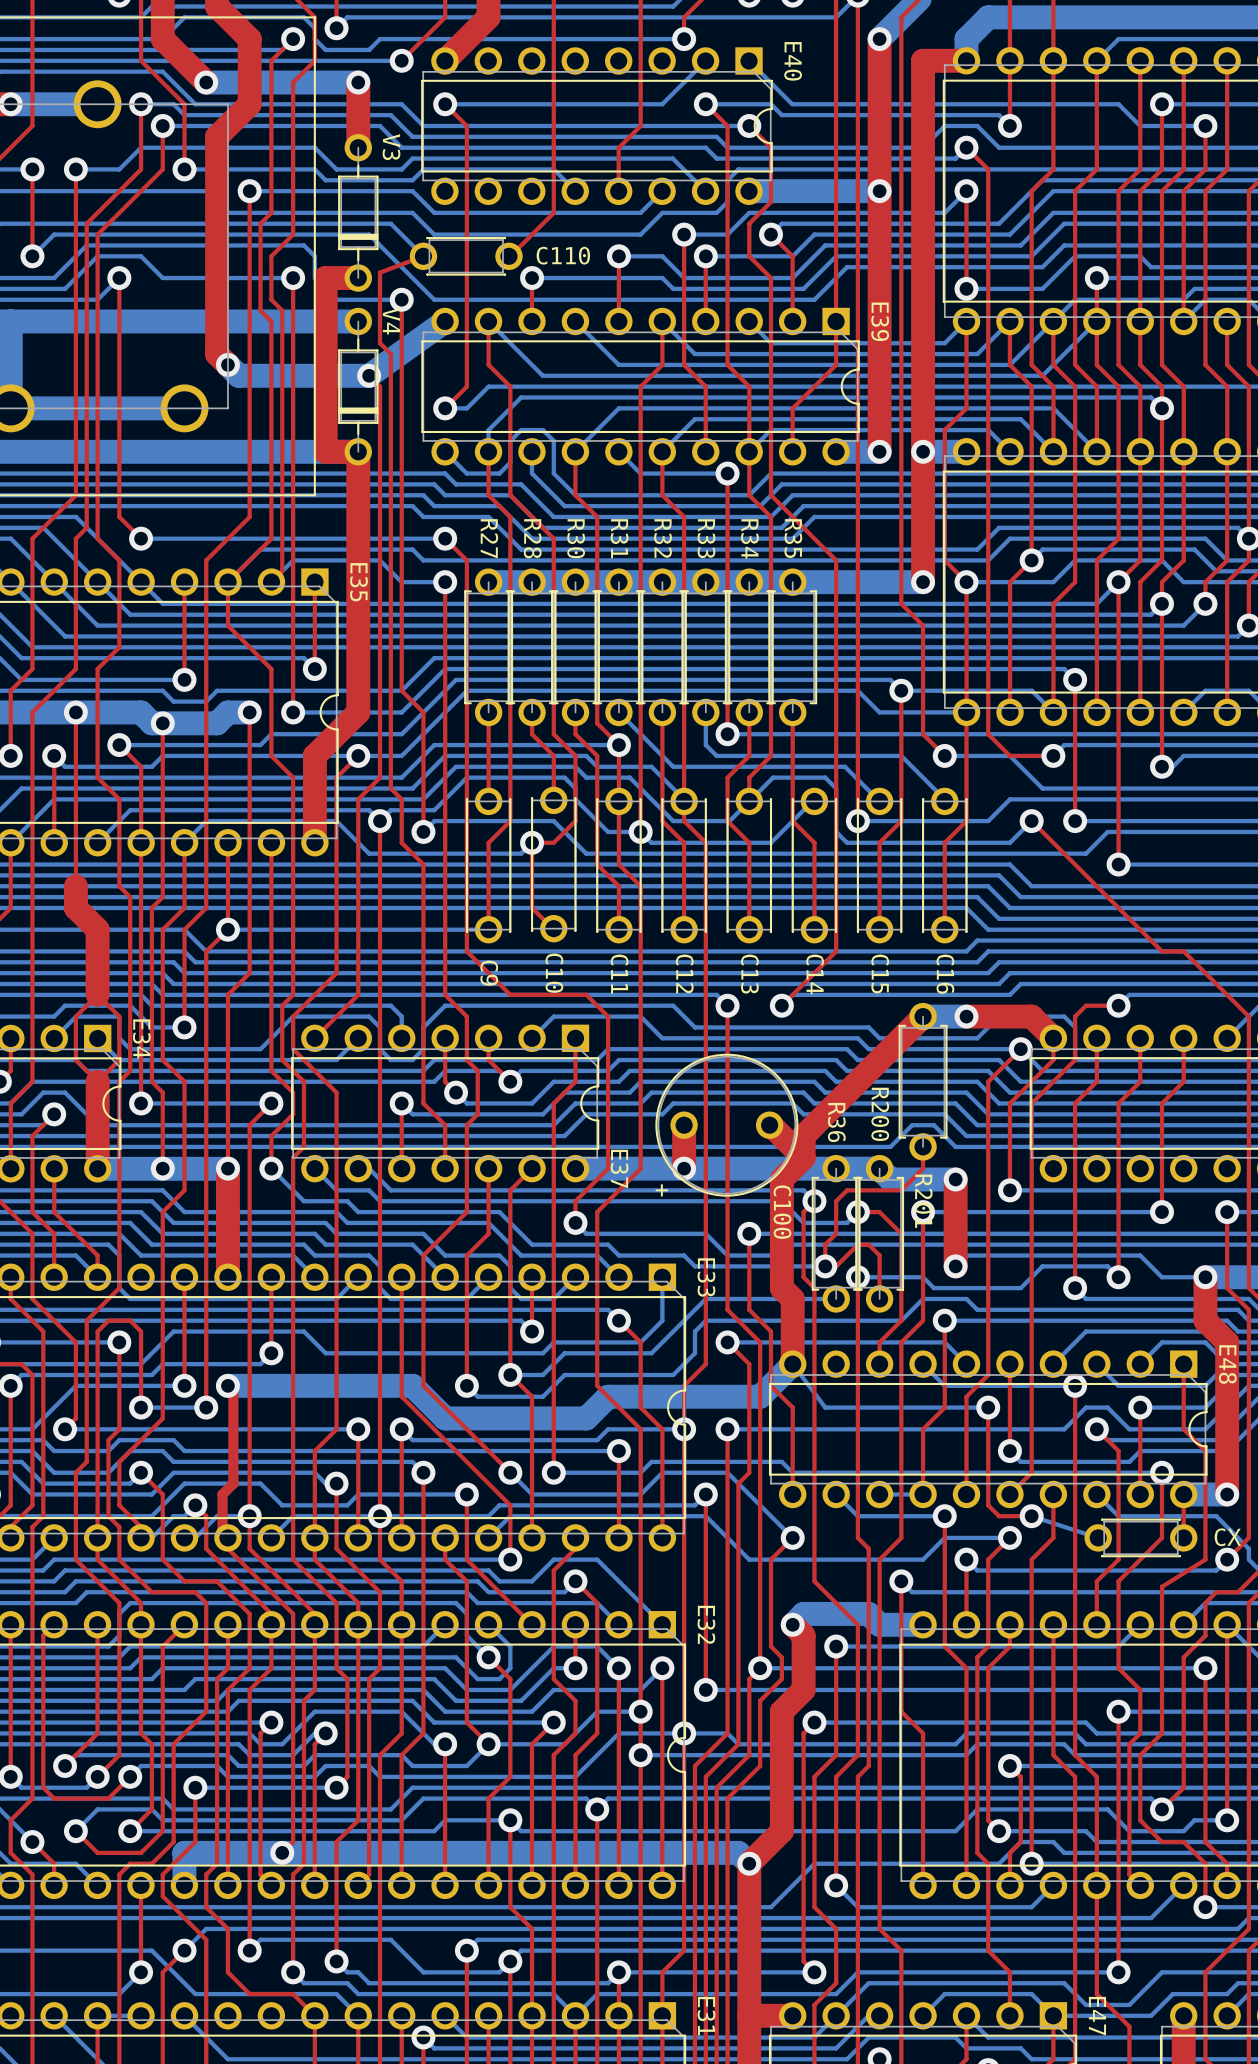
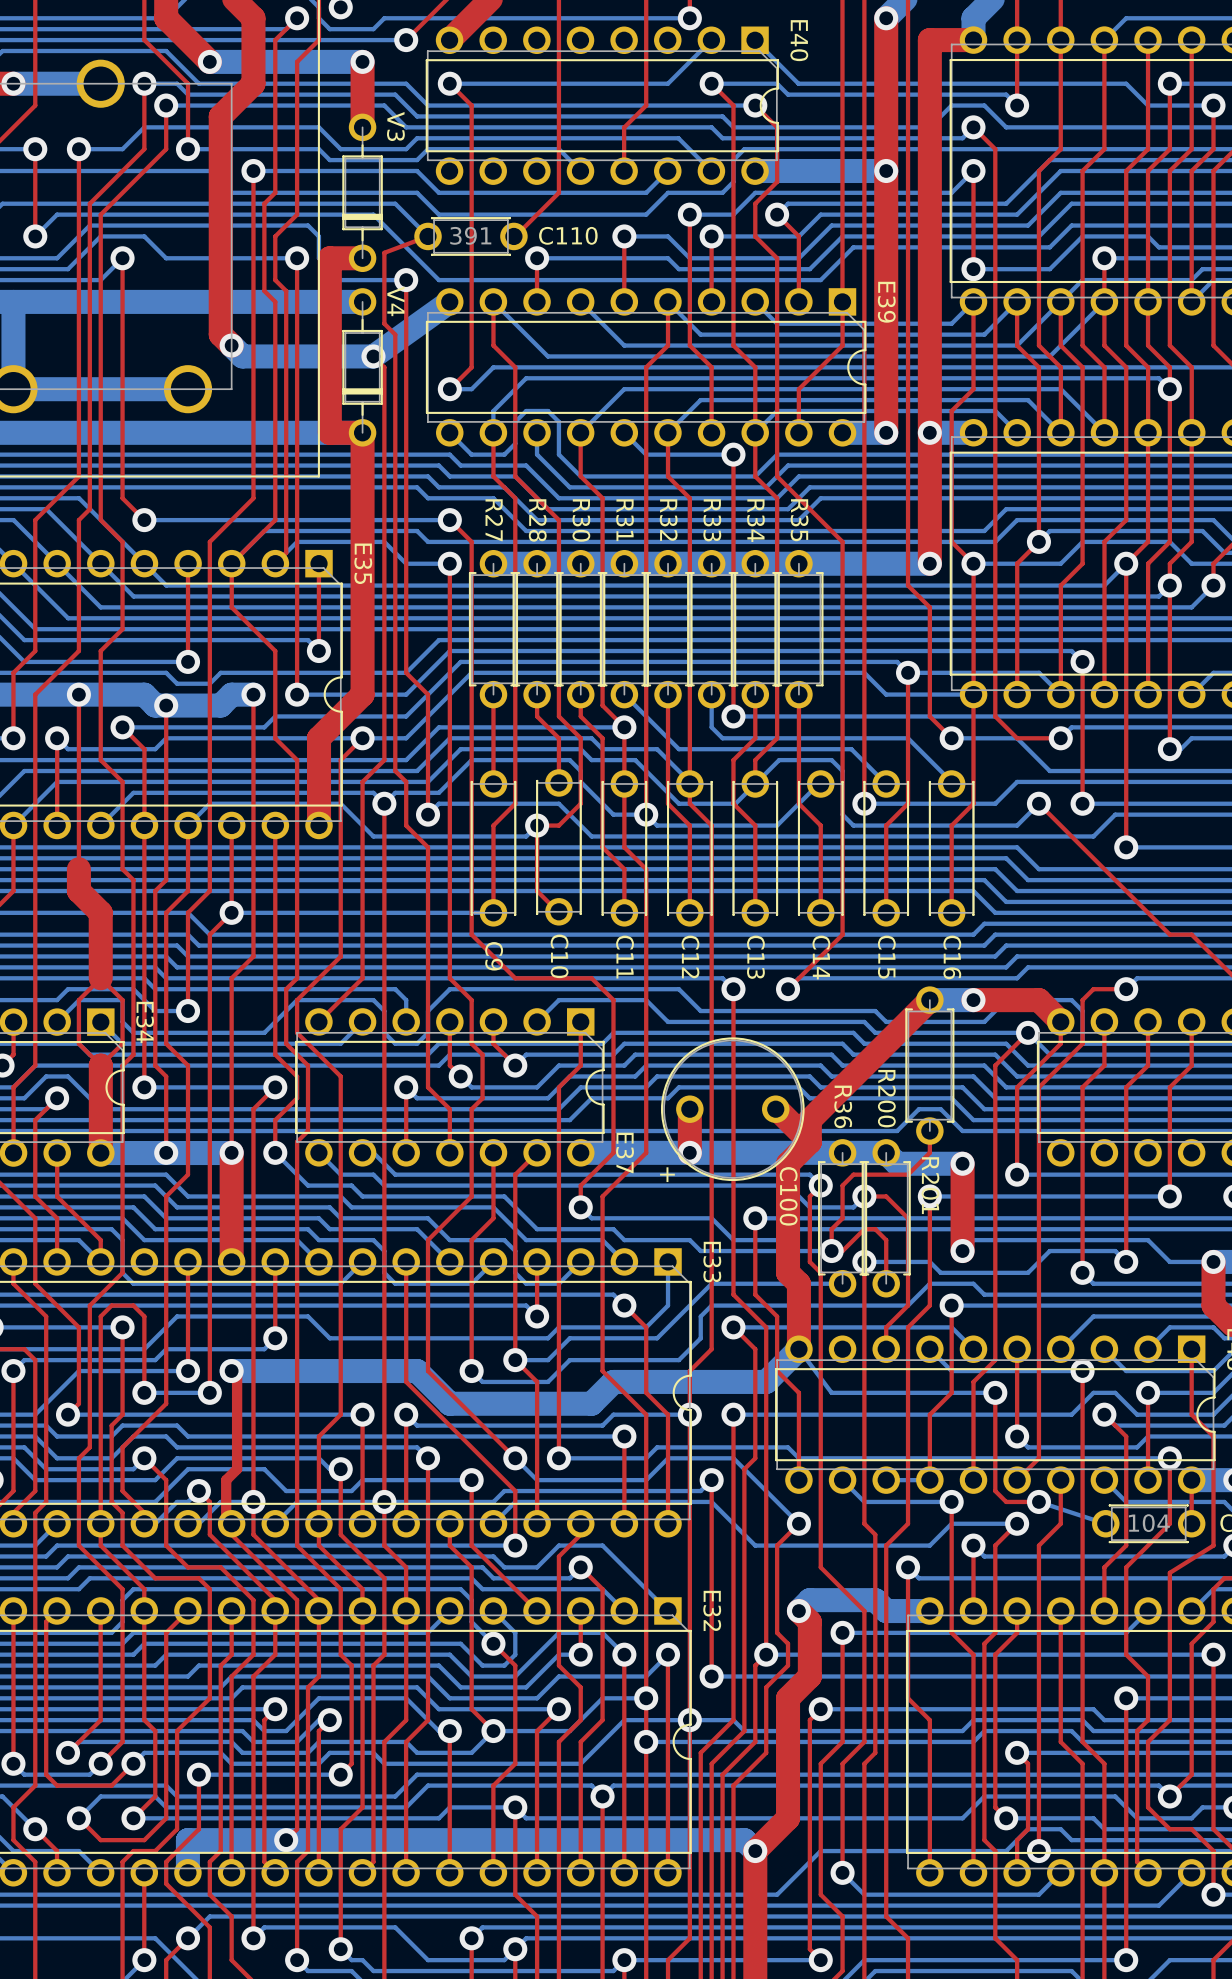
C110 value: none -> 391 (470, 235)
part value: none -> 104 (1149, 1523)

